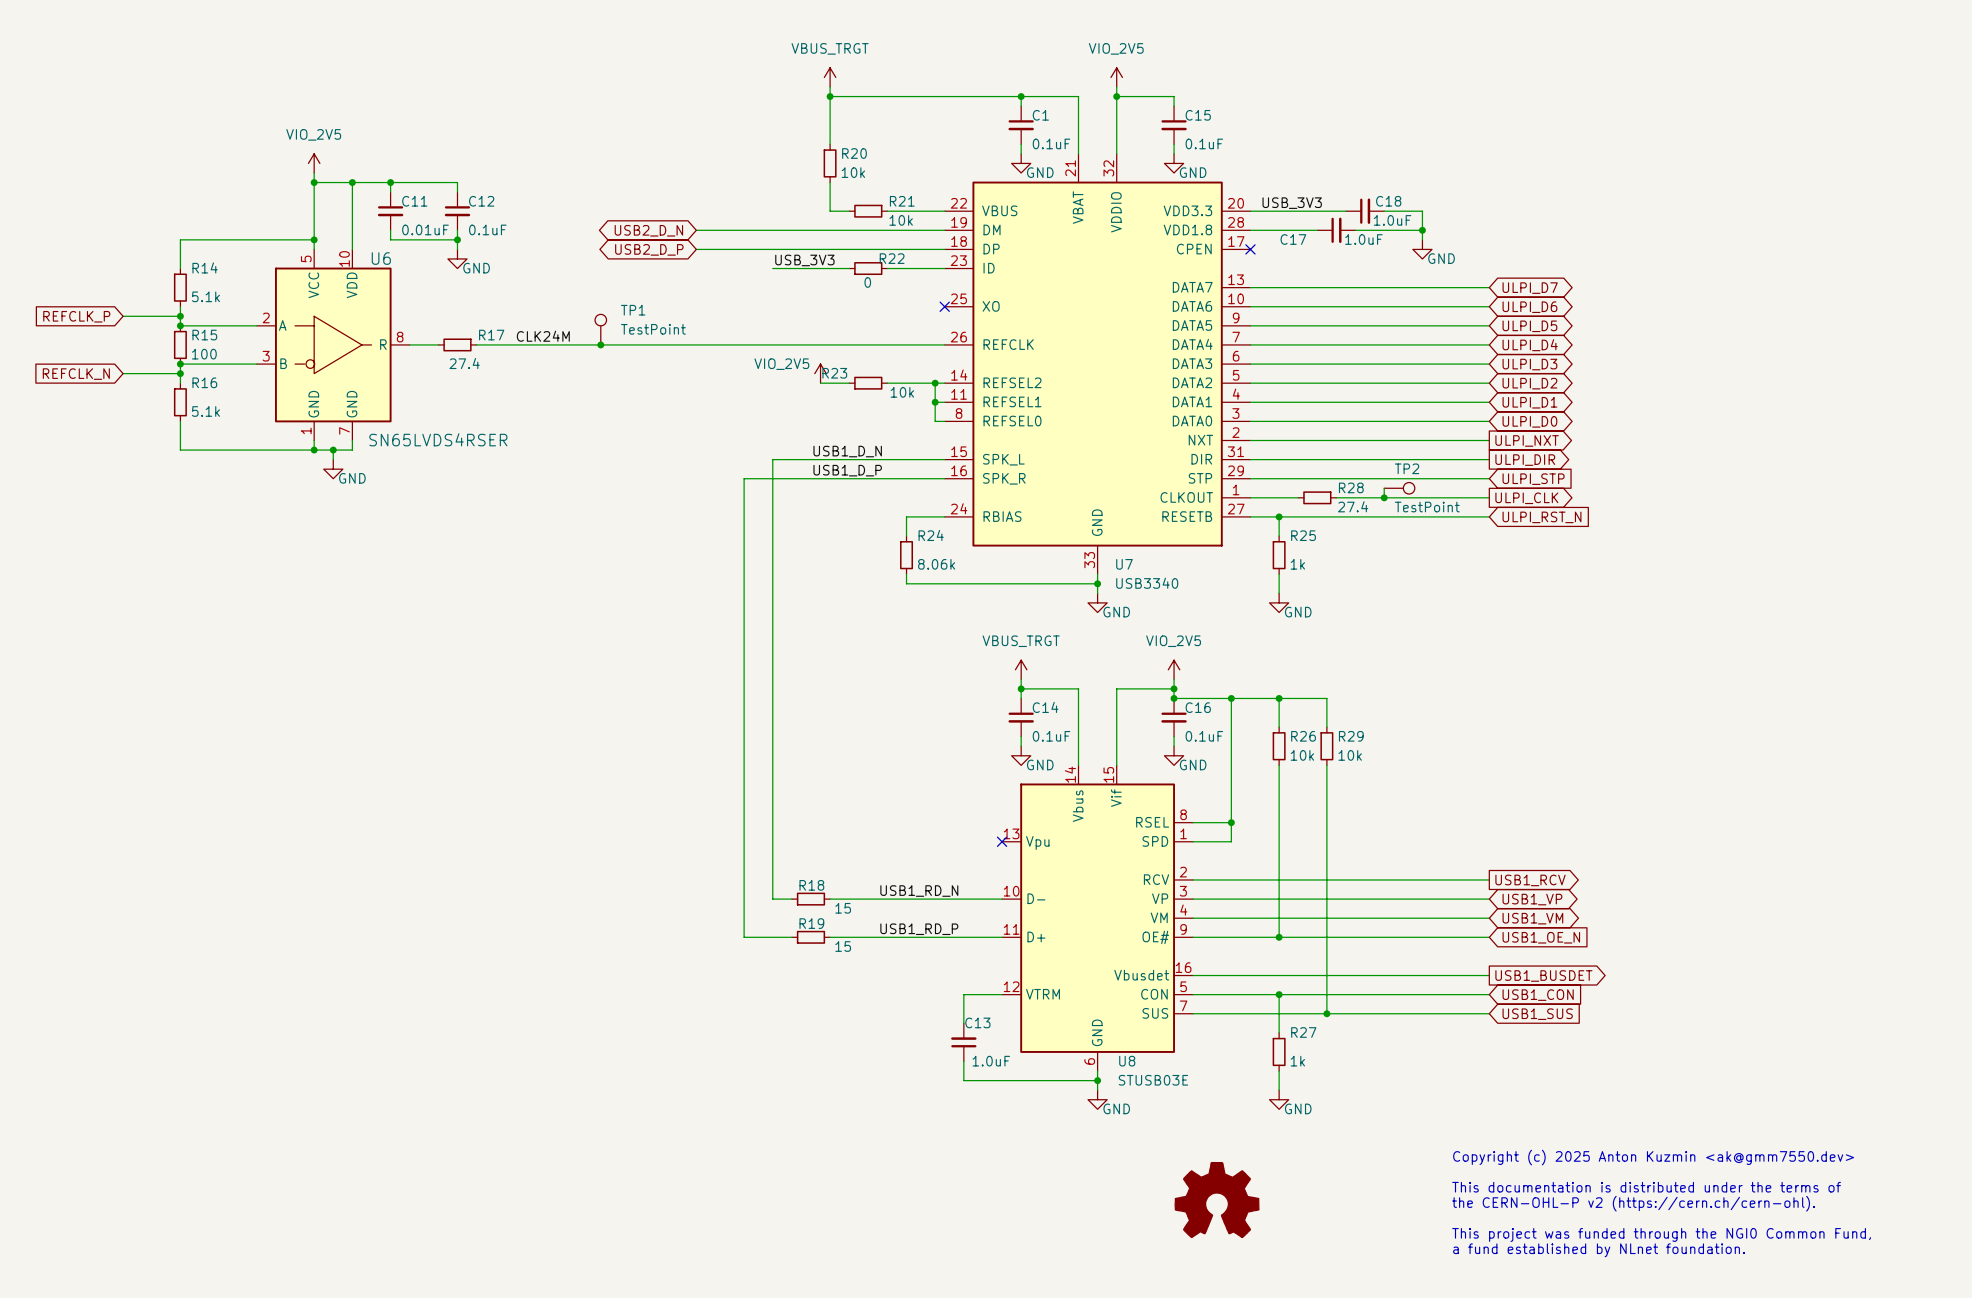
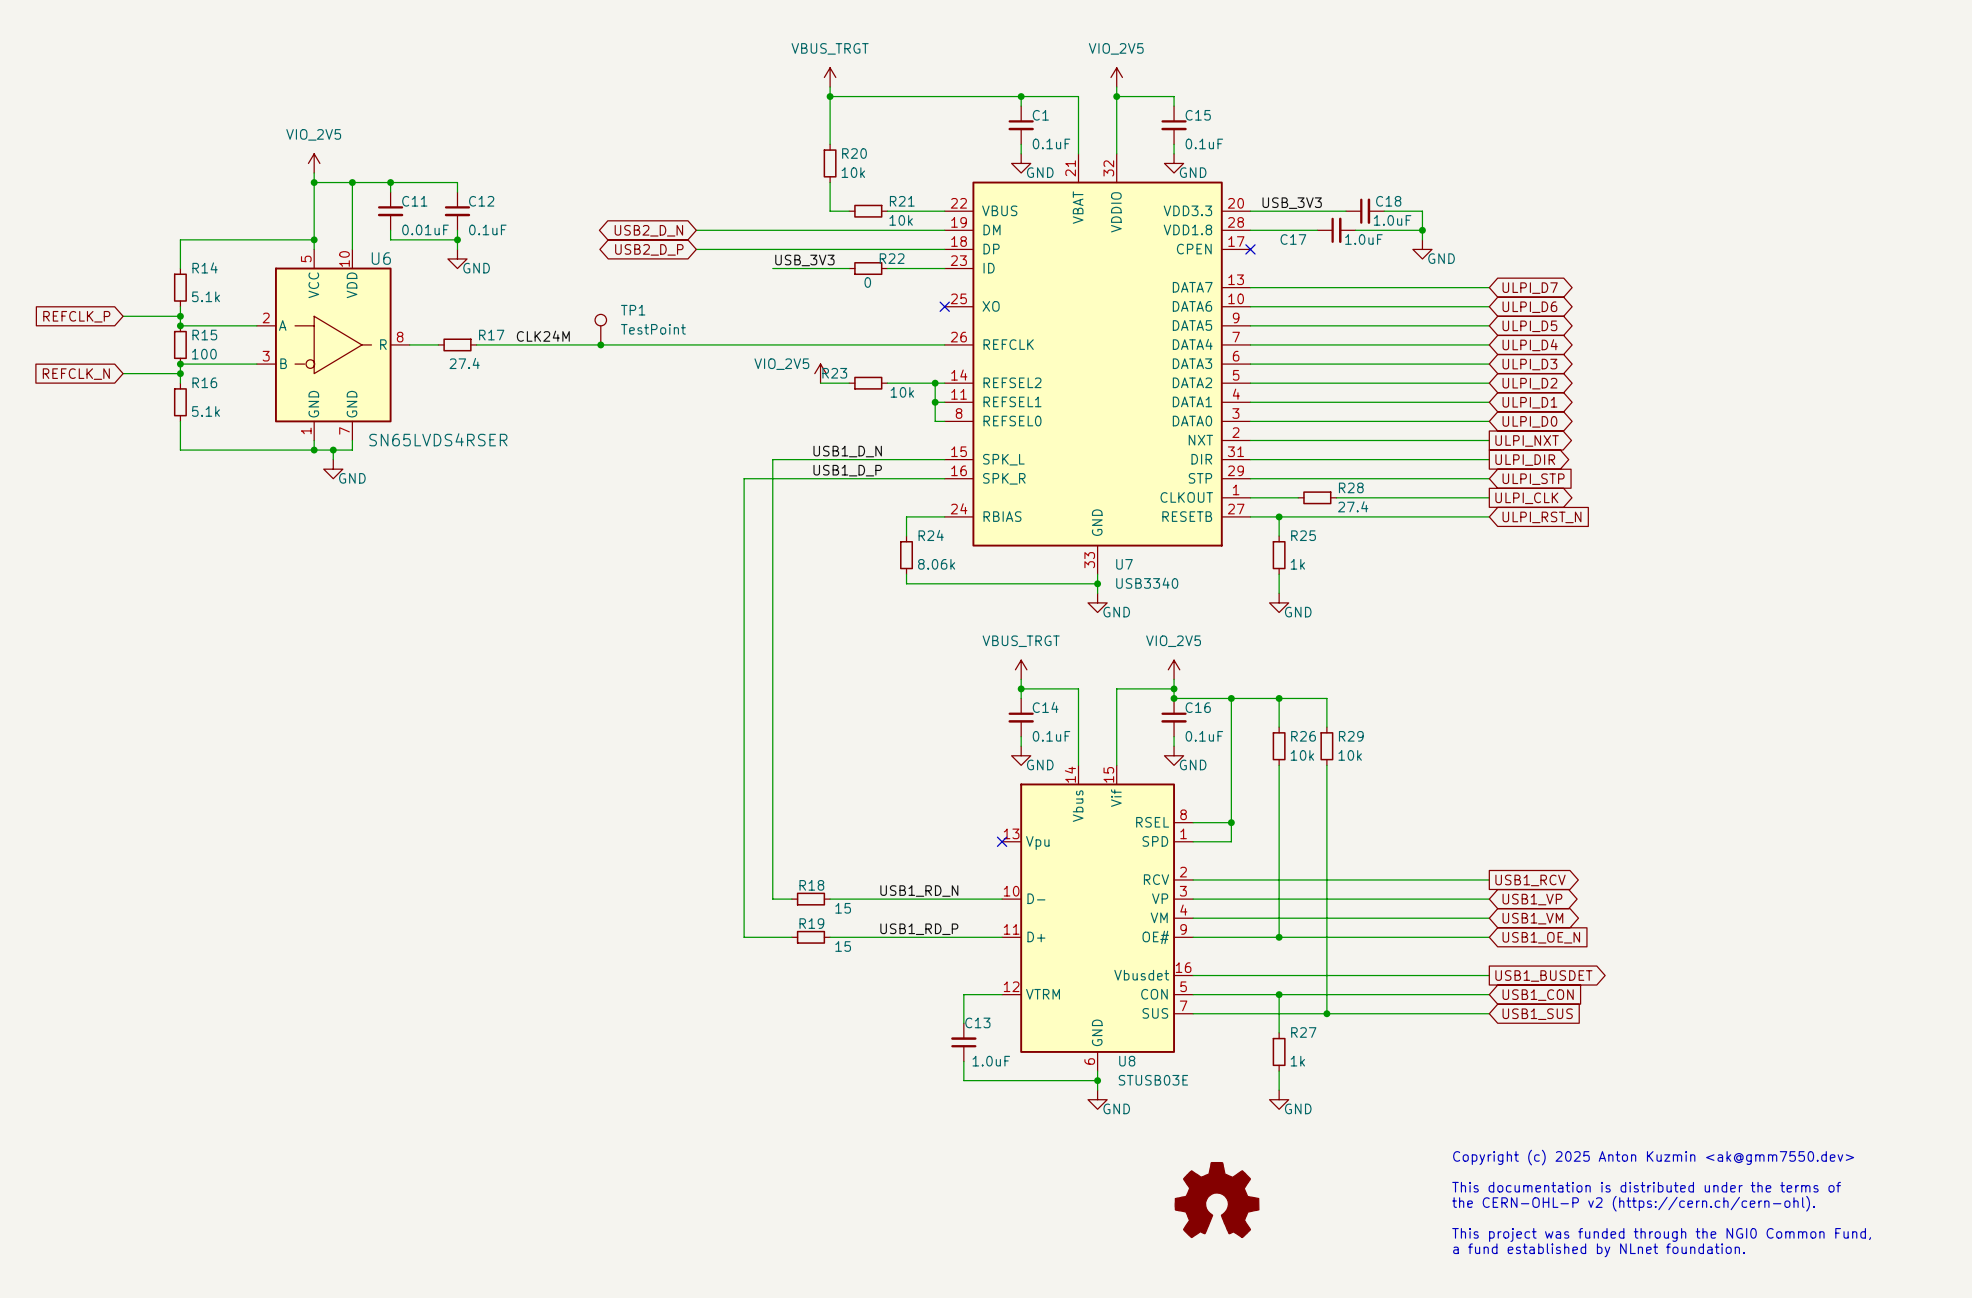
wire: (1384, 488) (1384, 497) -> none
TP2: TestPoint (1399, 488) -> none
junction: (1384, 497) -> none

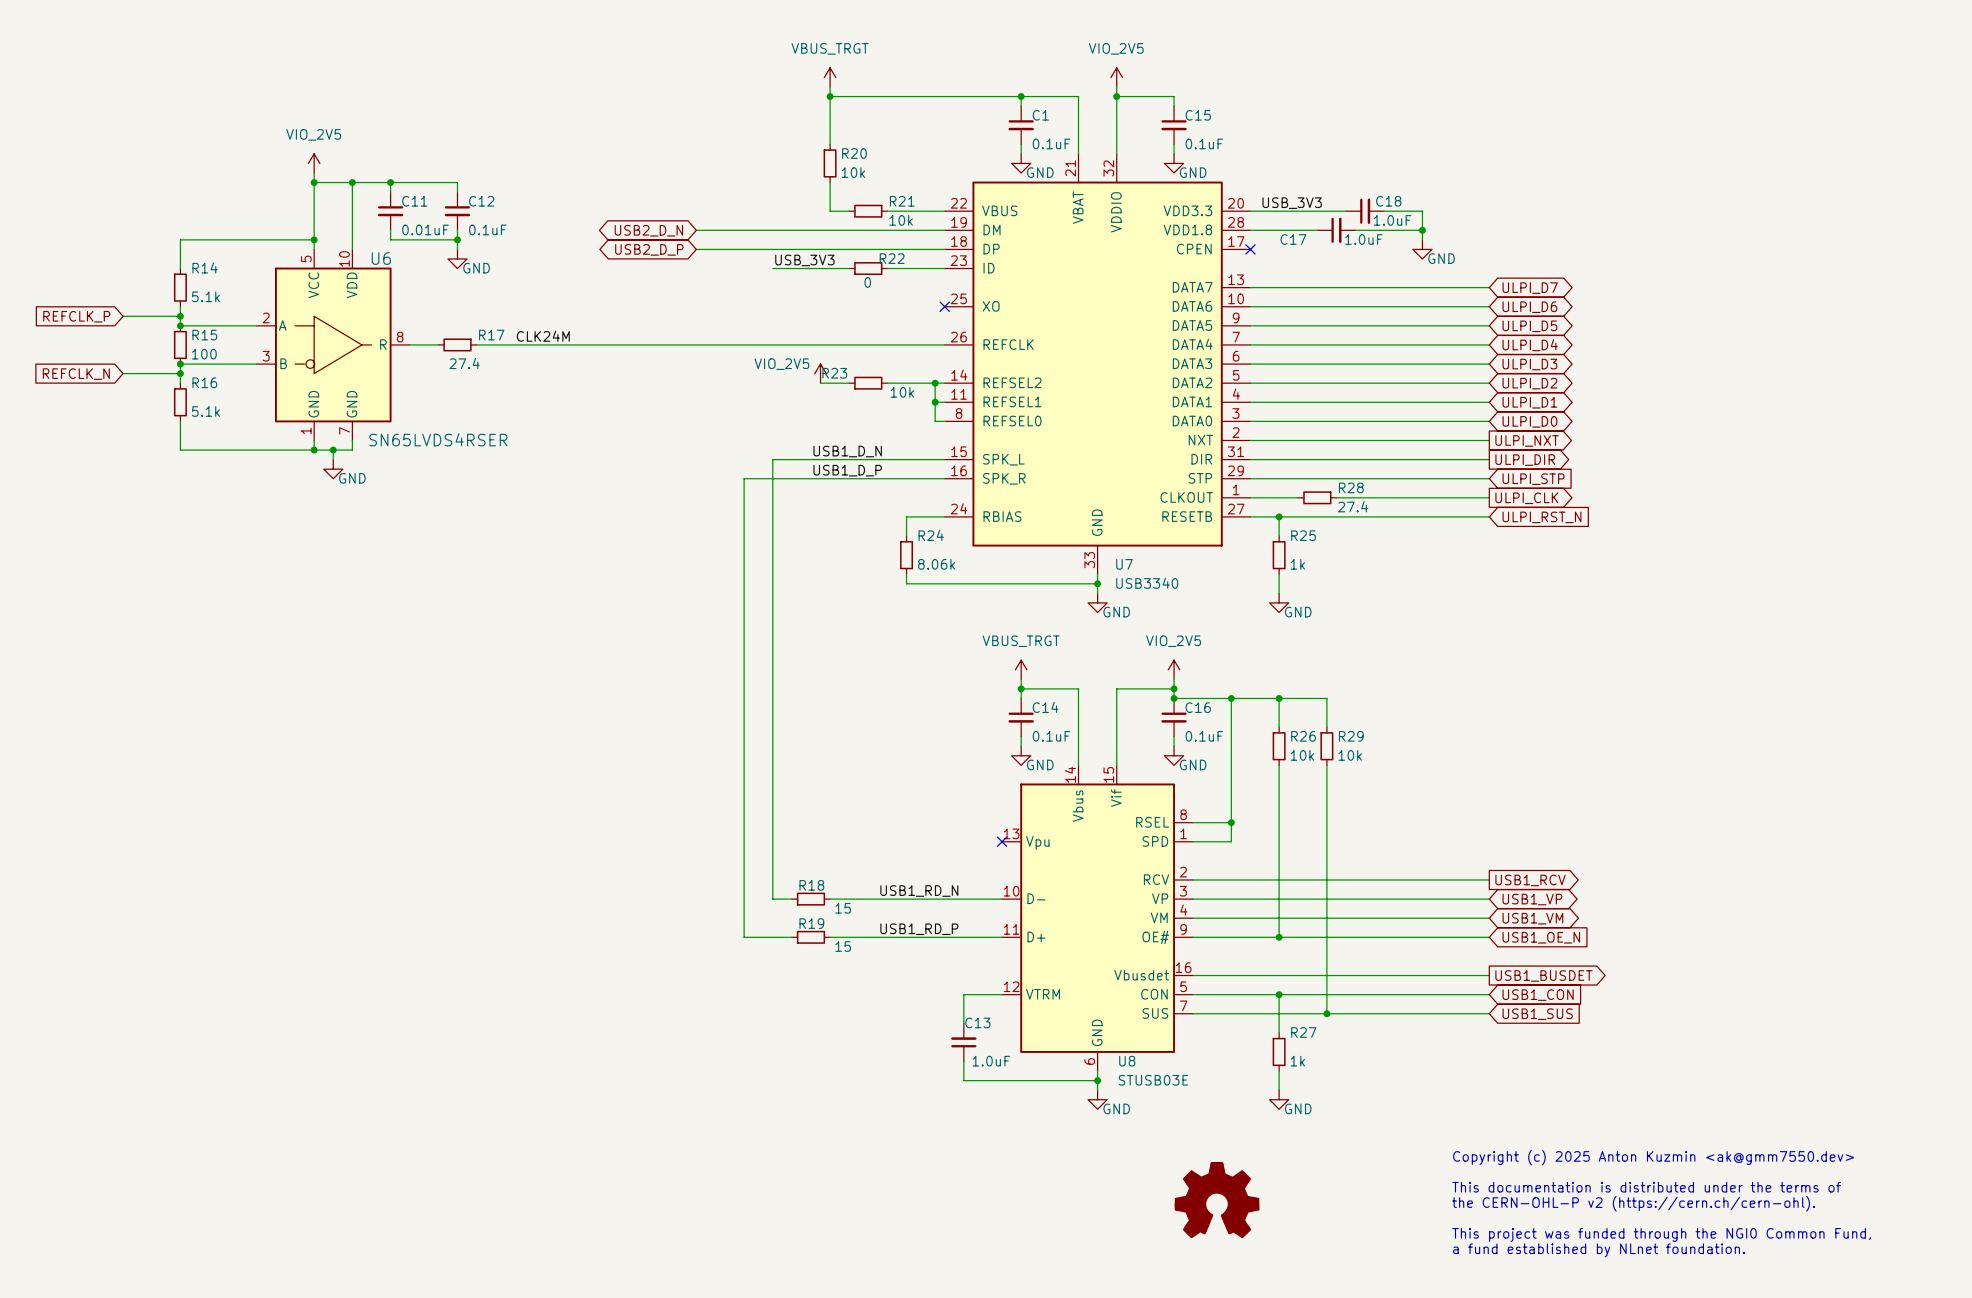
TP1: TestPoint (600, 329) -> none
junction: (600, 344) -> none

